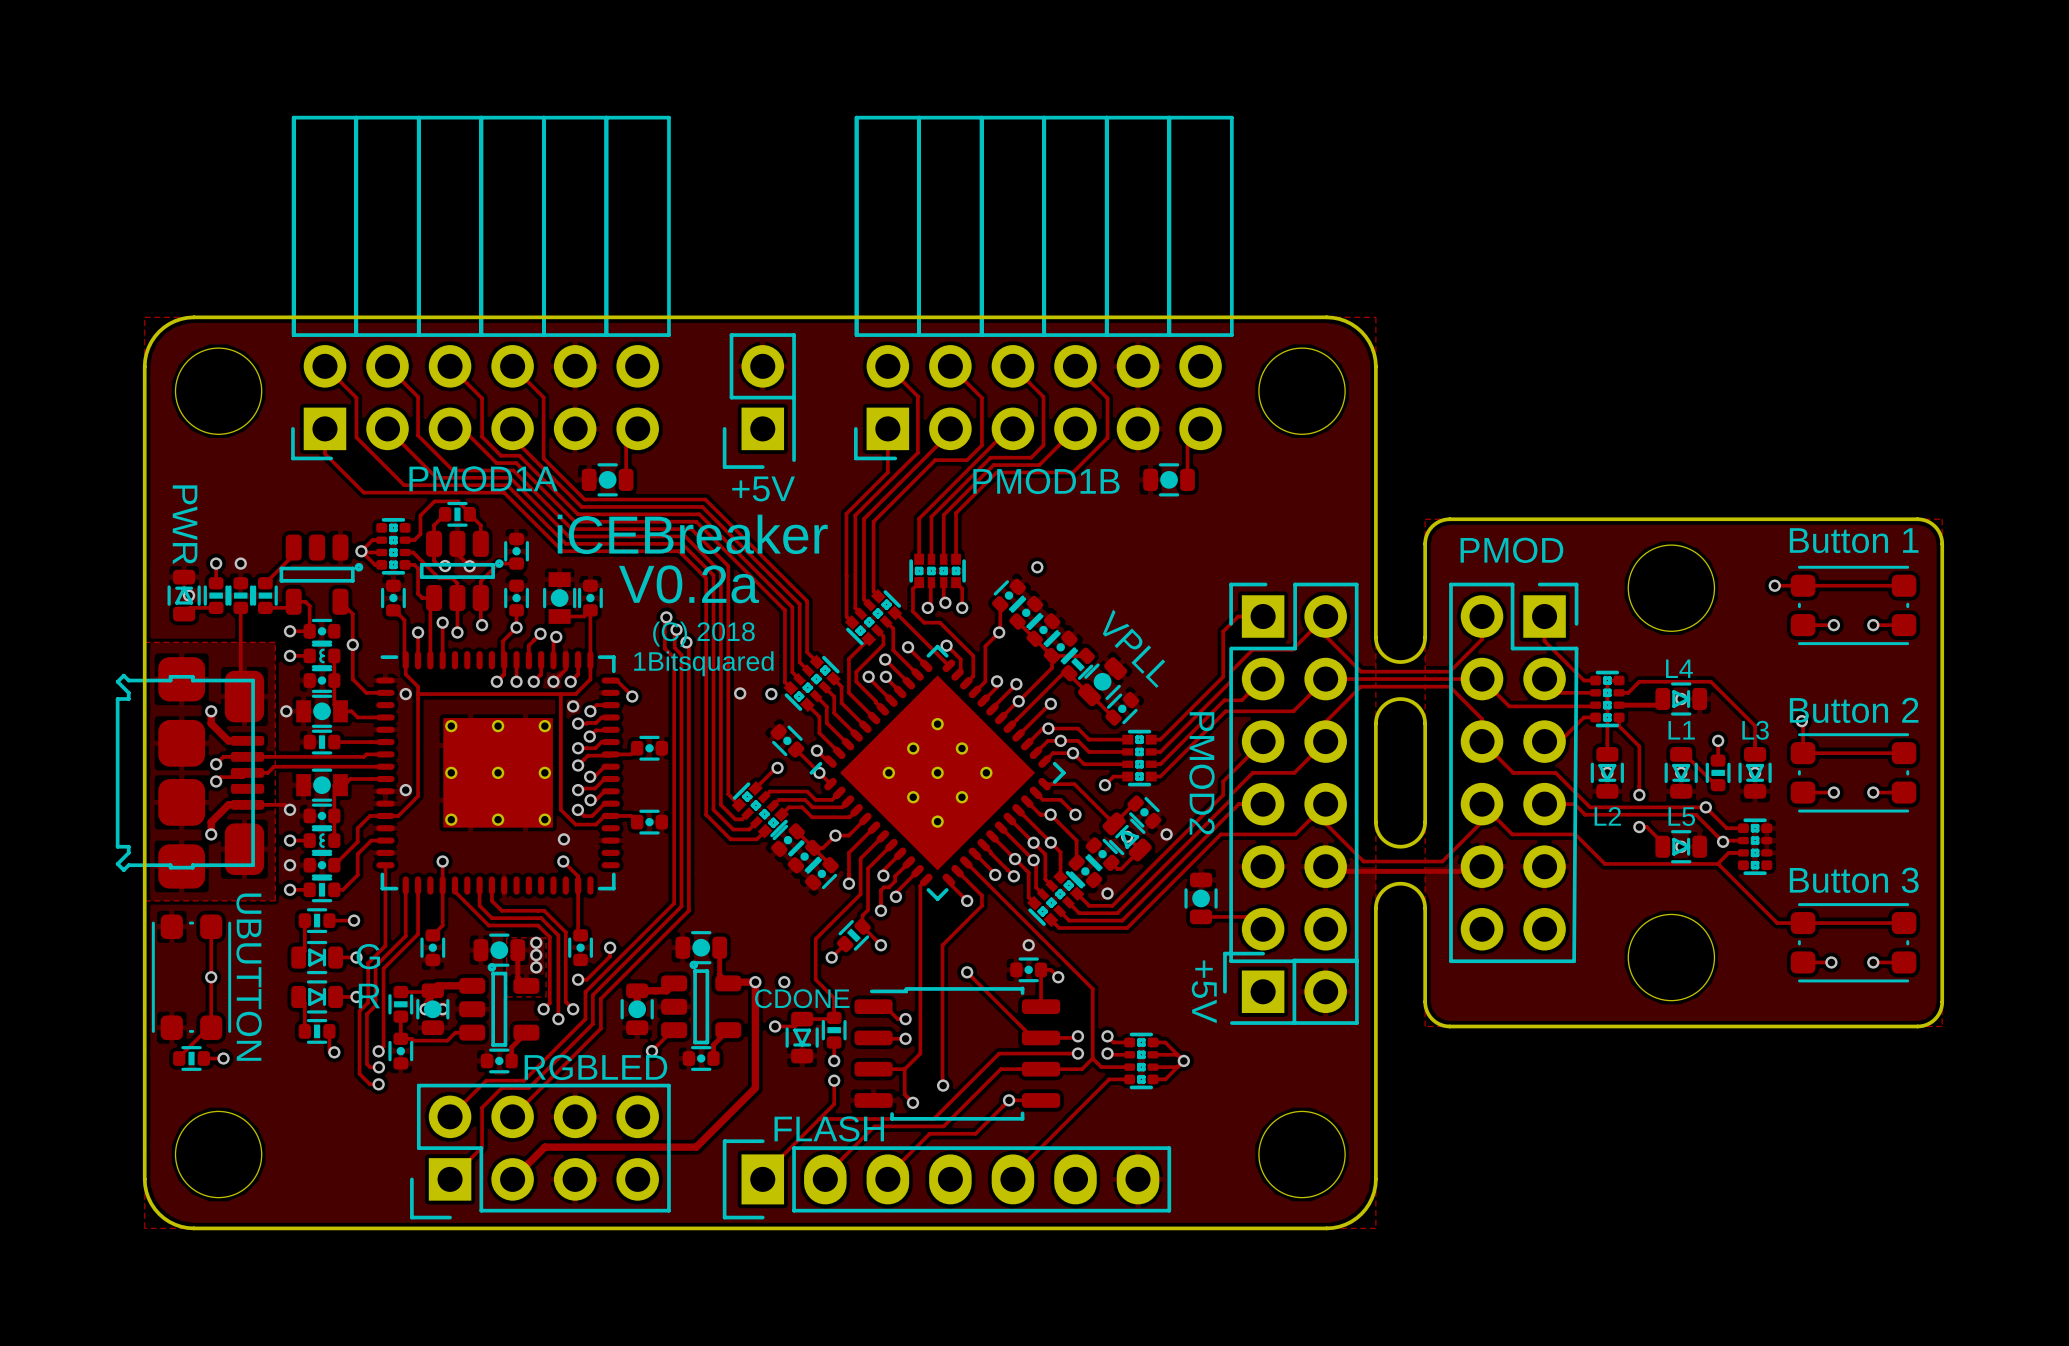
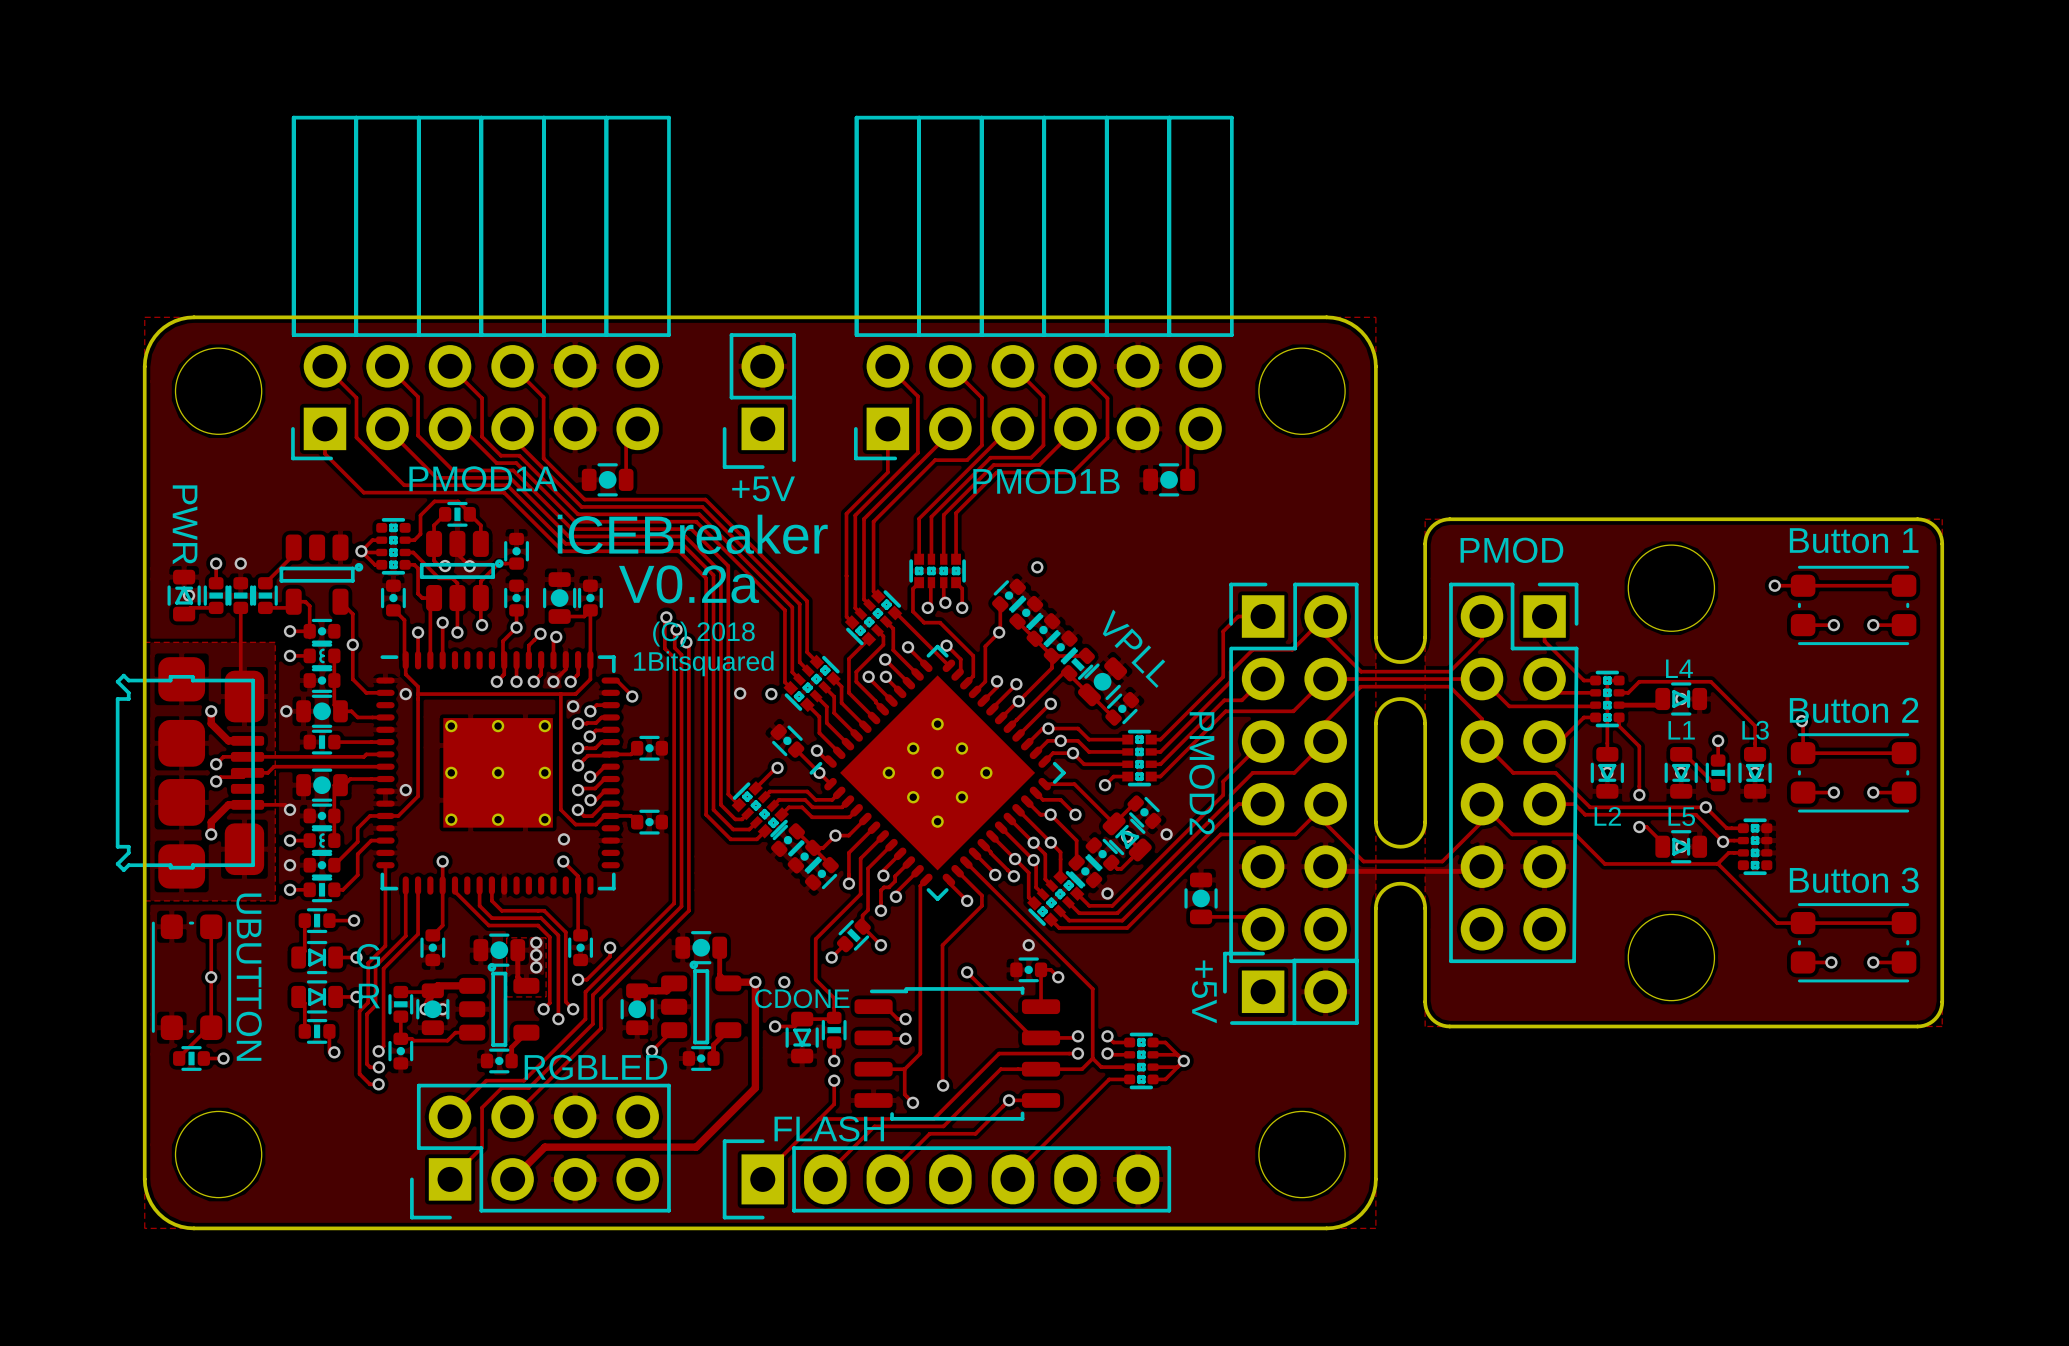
part footprint: [543, 572, 577, 624] -> [543, 572, 577, 624]
part footprint: [296, 694, 348, 728] -> [296, 694, 348, 728]
part footprint: [296, 768, 348, 802] -> [296, 768, 348, 802]

